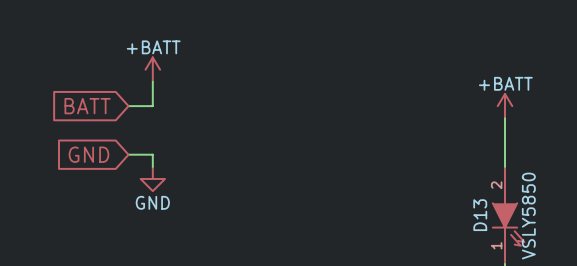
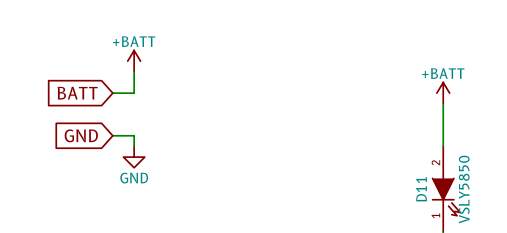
D13 name: D13 (480, 215) -> D11 (421, 189)

